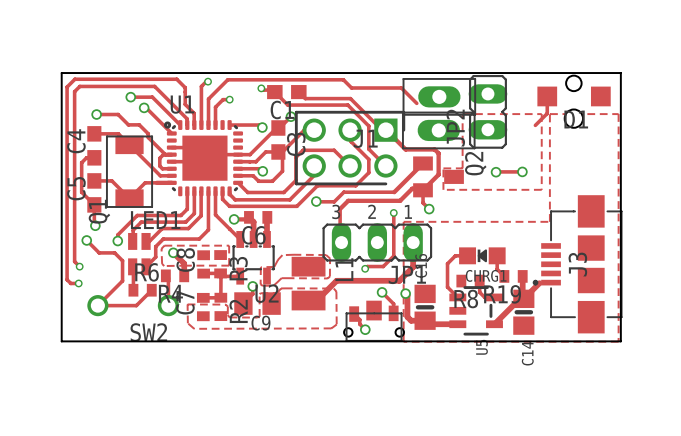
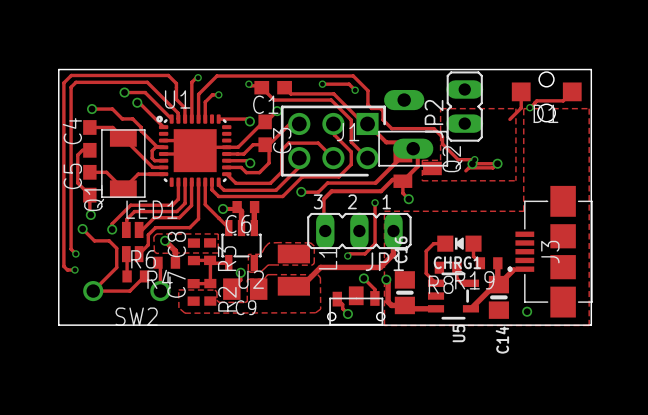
track: (343, 79) (351, 87) (401, 87) (416, 103) -> (327, 76) (353, 76) (367, 90) (367, 104) (371, 108) (380, 108) (383, 111) (383, 119) (391, 128) (433, 128) (442, 137) (442, 143) (458, 159) (474, 159)
track: none -> (322, 84) (349, 84) (355, 90)
via: none -> (322, 84)
via: none -> (355, 90)
part side: top (439, 96) -> bottom (404, 100)
track: none -> (572, 91) (563, 100) (536, 100) (529, 107)
via: none -> (529, 107)
part position: (438, 130) -> (413, 148)
via: none -> (474, 159)
track: none -> (492, 167) (468, 167) (465, 170)
via: none -> (527, 311)

